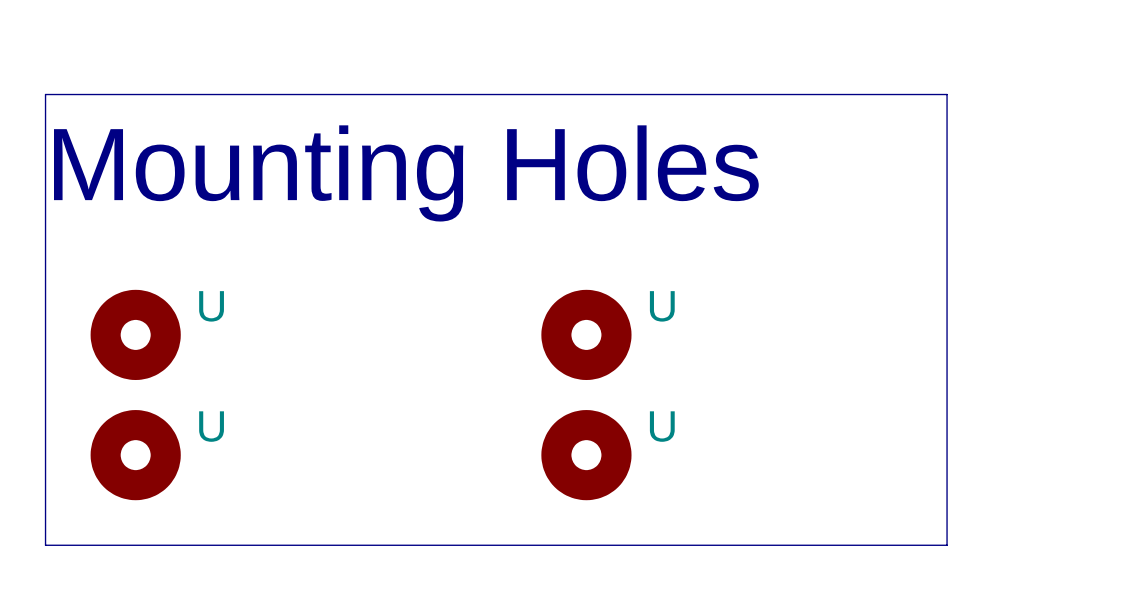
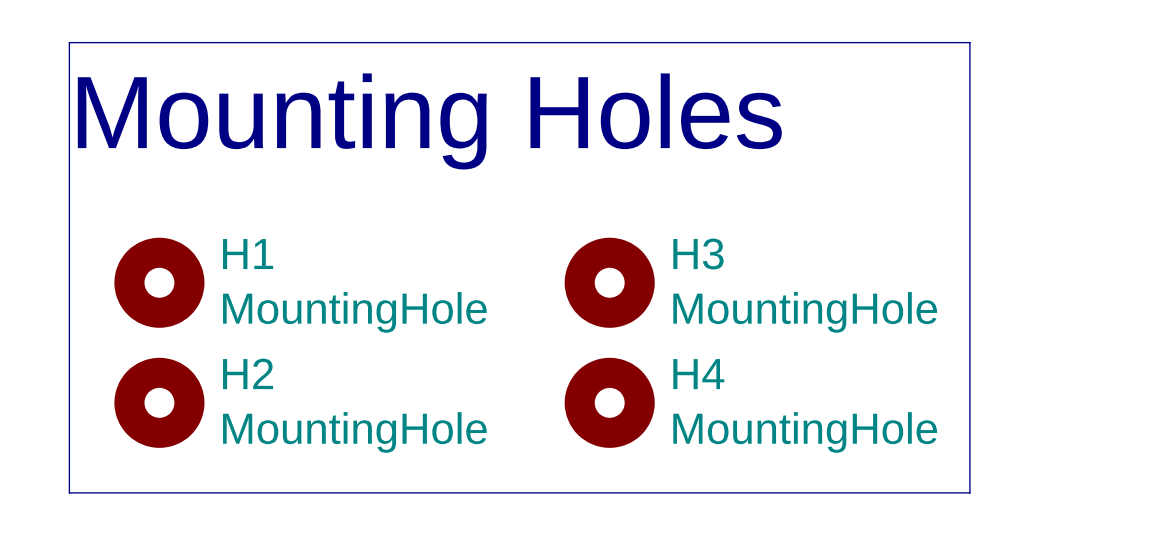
U name: U (211, 306) -> H1 (248, 254)
U name: U (662, 306) -> H3 (698, 254)
U value: none -> MountingHole (354, 312)
U value: none -> MountingHole (805, 312)
U name: U (211, 426) -> H2 (248, 373)
U name: U (662, 426) -> H4 (698, 374)
U value: none -> MountingHole (354, 432)
U value: none -> MountingHole (805, 432)

